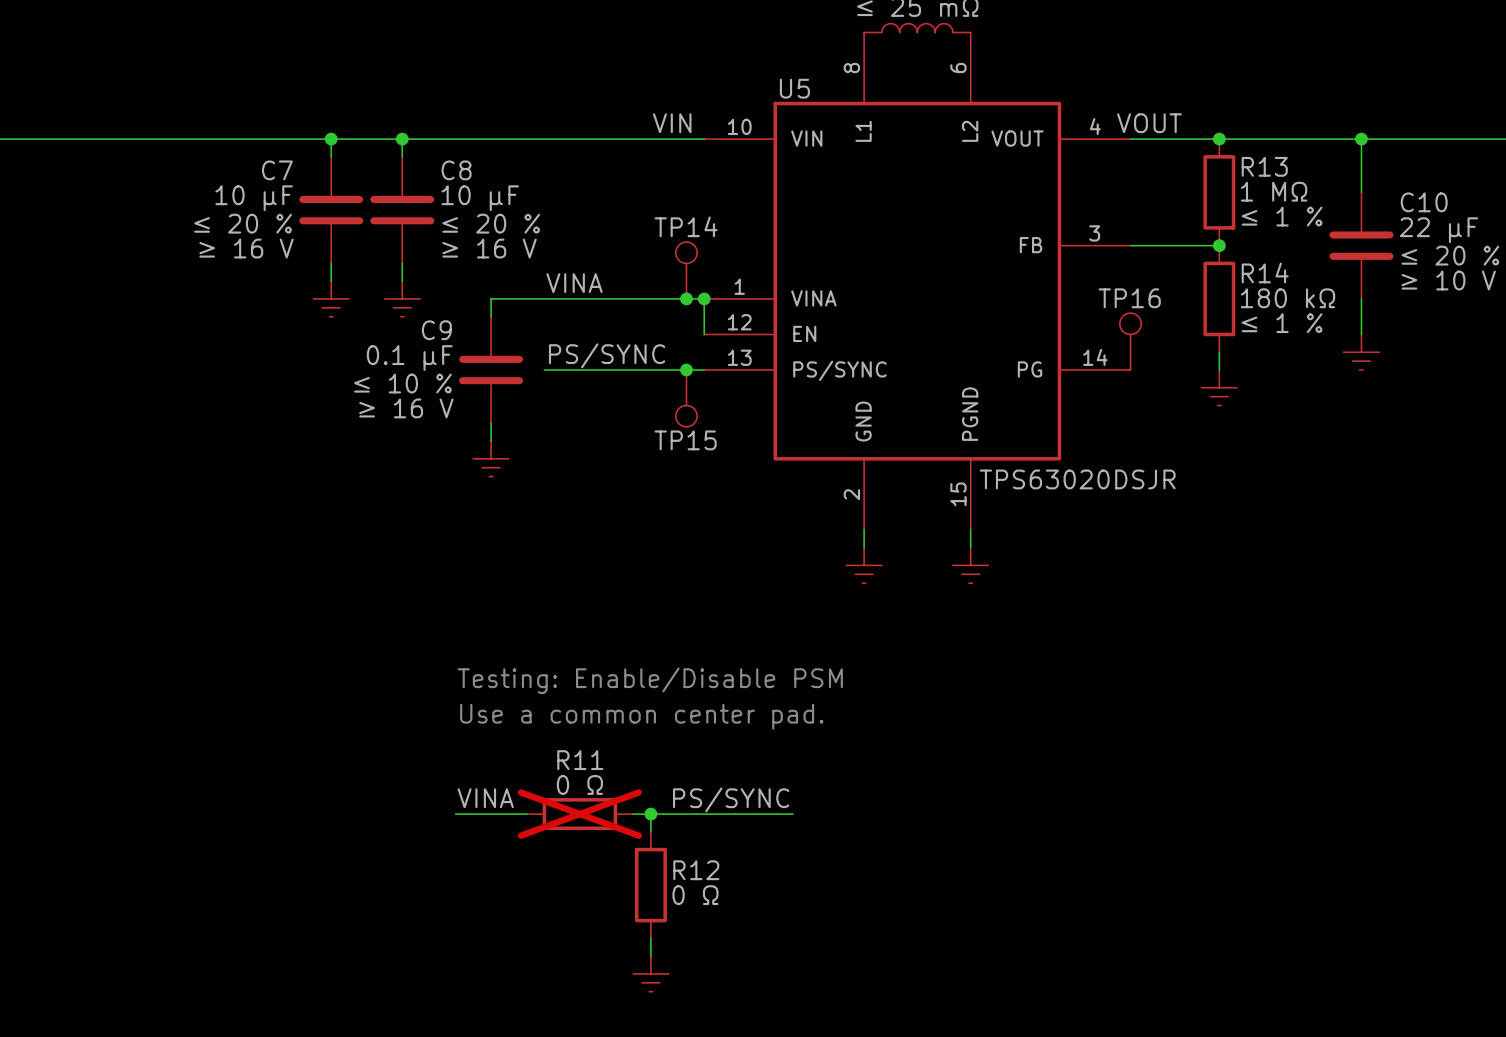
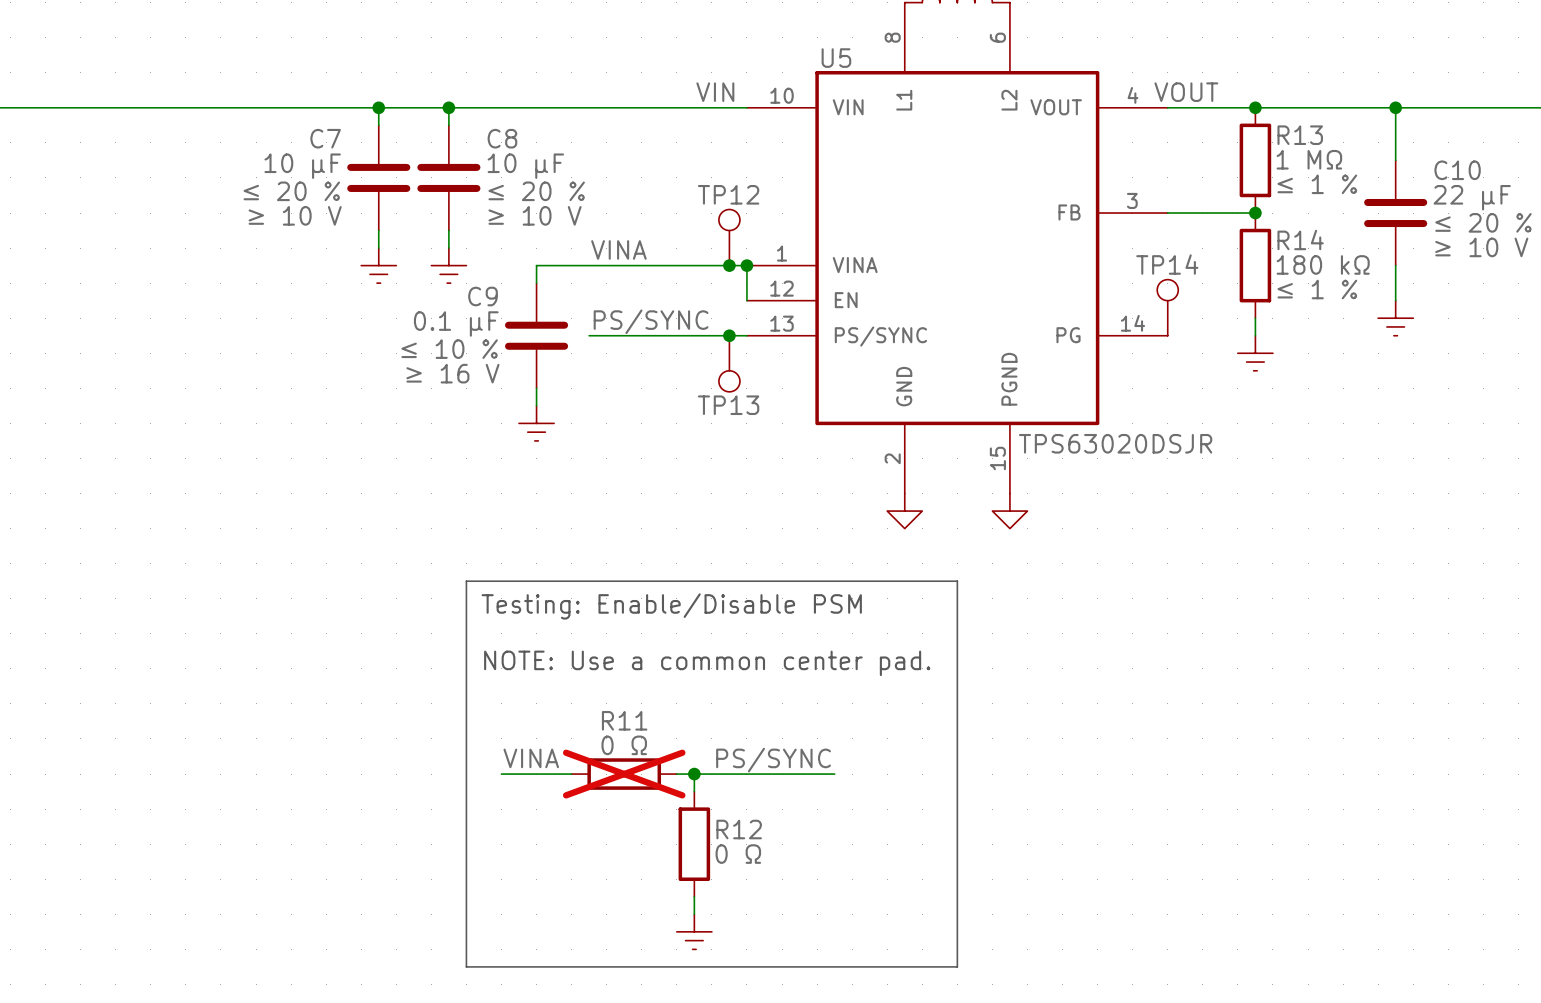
TP14 name: TP14 (686, 226) -> TP12 (728, 194)
C7 text: ≥ 16 V (246, 248) -> ≥ 10 V (295, 215)
C8 text: ≥ 16 V (489, 248) -> ≥ 10 V (535, 215)
TP16 name: TP16 (1129, 298) -> TP14 (1167, 264)
TP15 name: TP15 (685, 440) -> TP13 (728, 405)
power symbol: none -> (904, 511)
power symbol: none -> (1009, 511)
power symbol: (864, 565) -> none
power symbol: (970, 565) -> none
line: none -> (466, 581) (957, 581) (957, 966) (466, 966) (466, 581)
text position: Testing: Enable/Disable PSM (650, 680) -> Testing: Enable/Disable PSM (671, 606)
text: Use a common center pad. (641, 716) -> NOTE: Use a common center pad. (707, 663)

